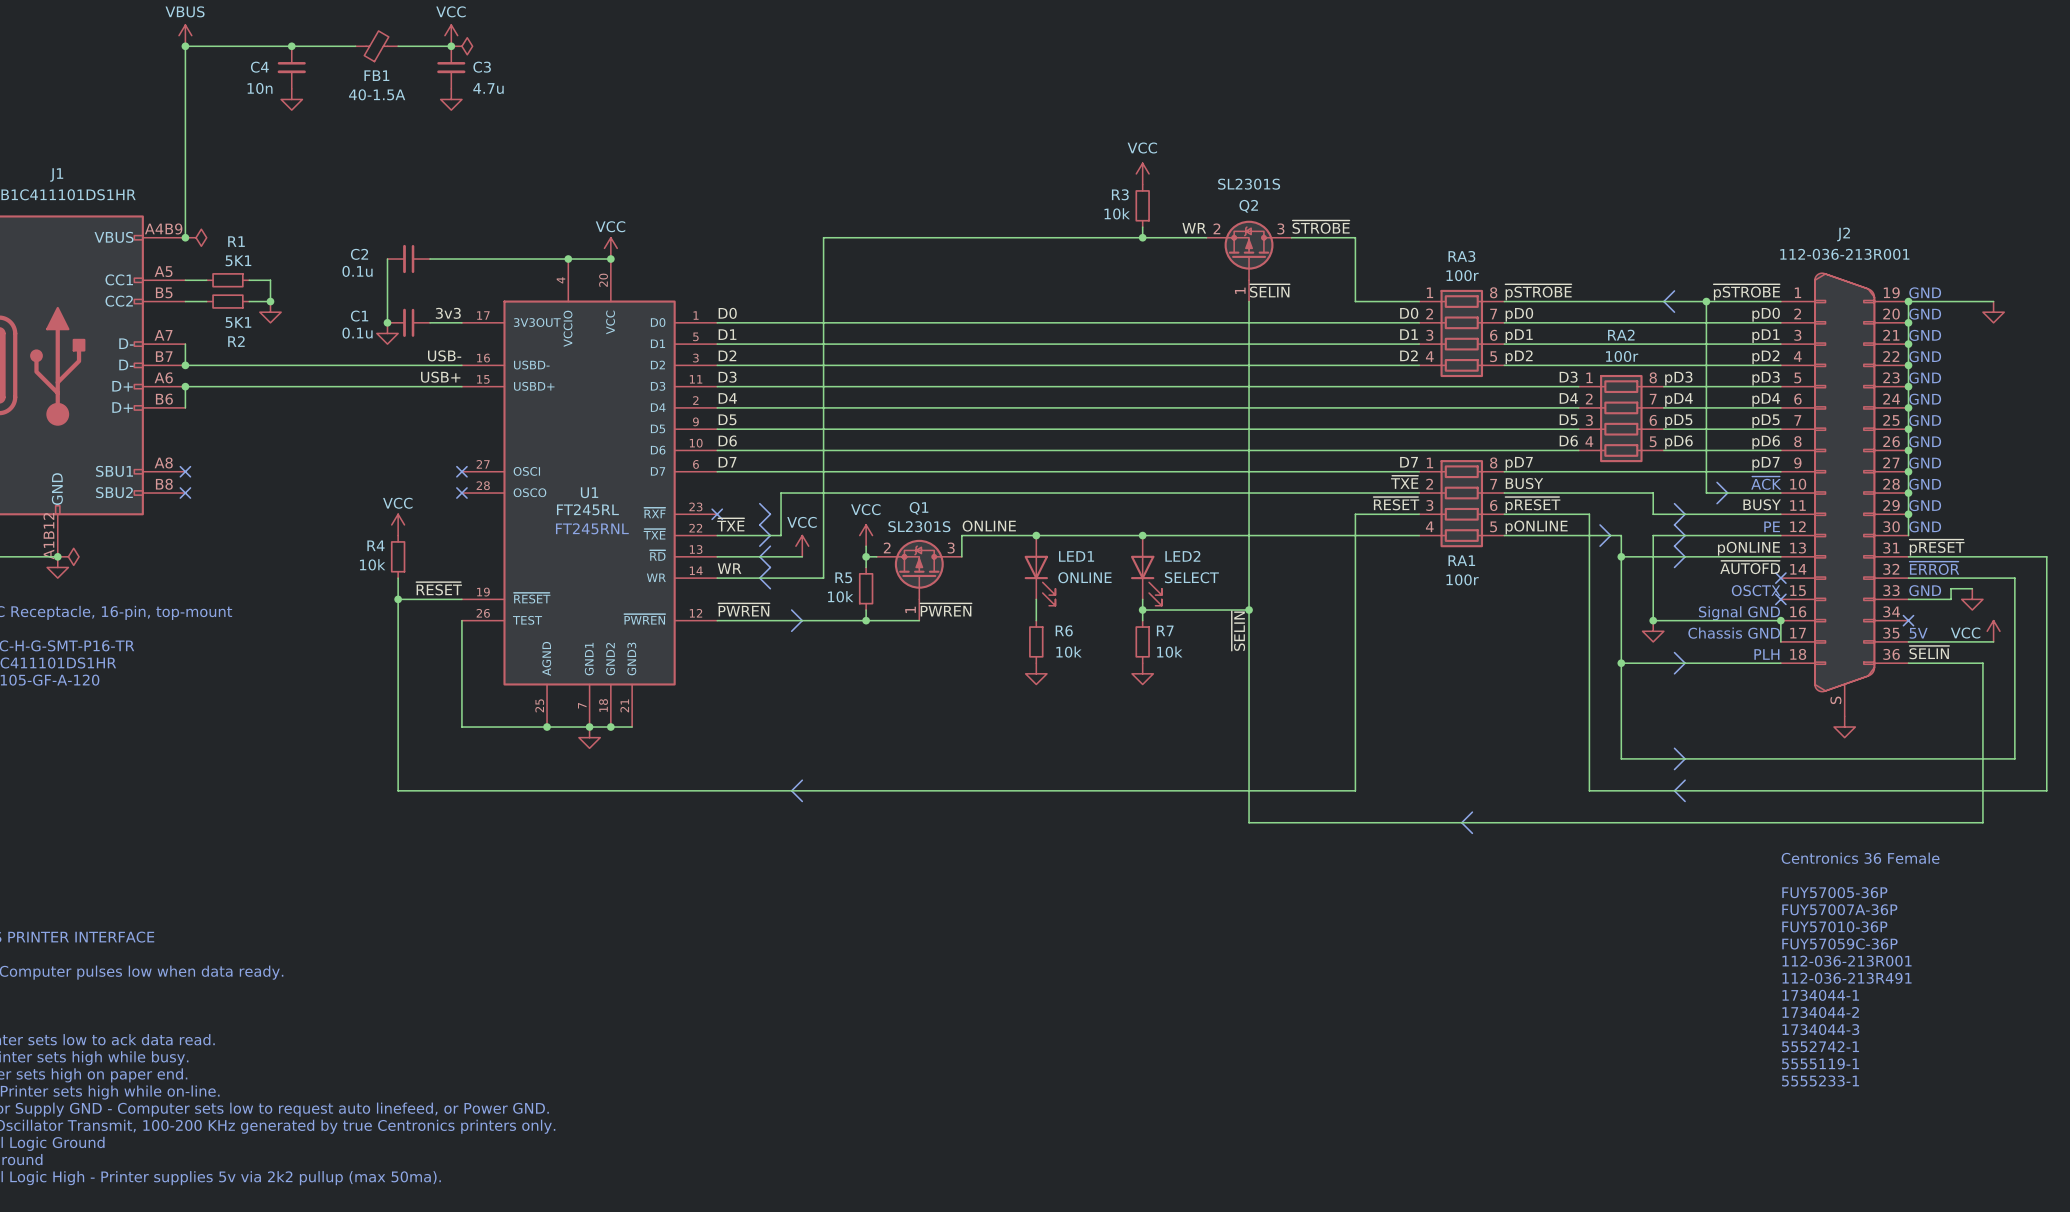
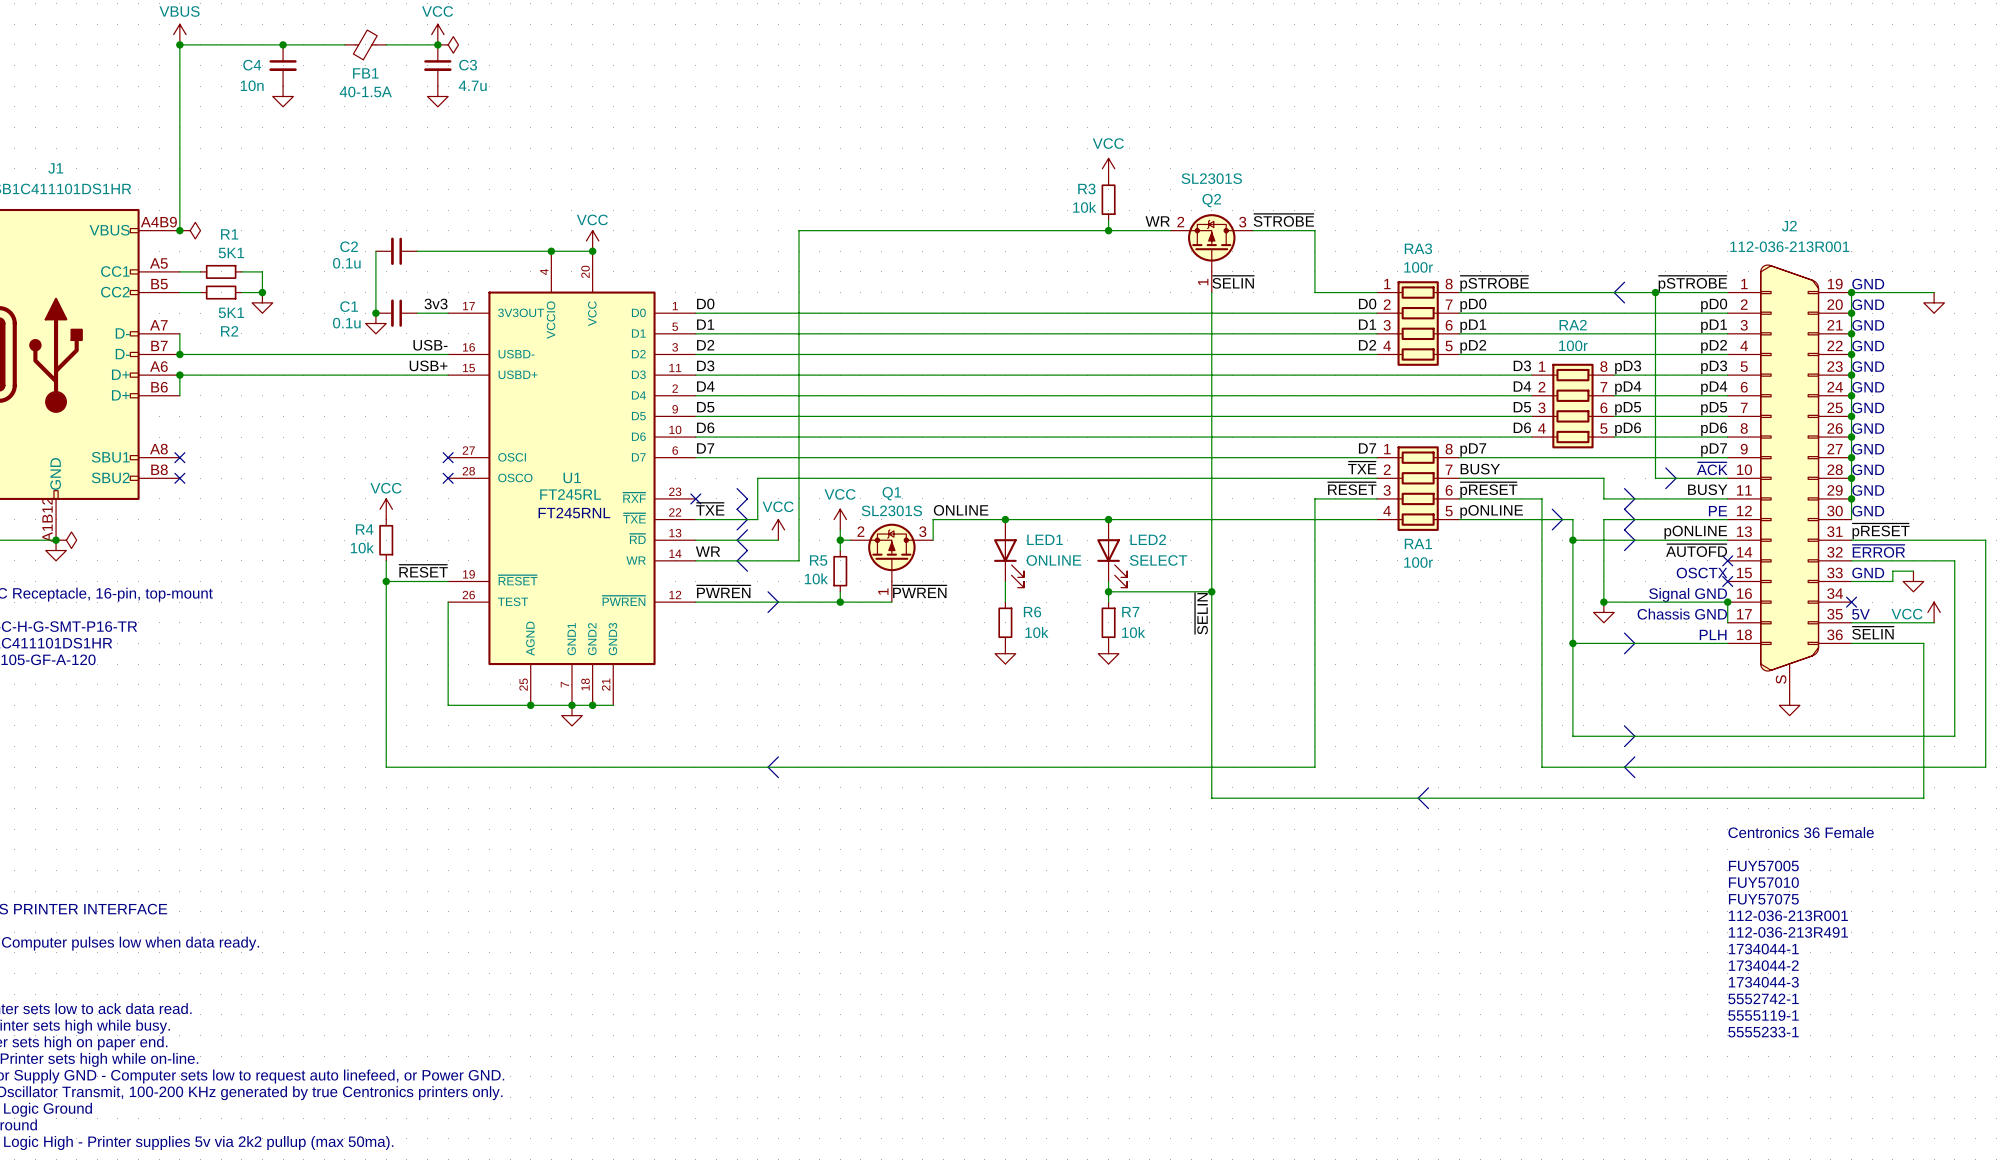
text: FUY57005-36P (1834, 892) -> FUY57005 (1763, 865)
text: FUY57007A-36P (1839, 909) -> FUY57010 (1763, 882)
text: FUY57010-36P (1834, 926) -> FUY57075 (1763, 899)
text: FUY57059C-36P (1839, 944) -> 112-036-213R001 (1788, 915)
text: 112-036-213R001 (1847, 961) -> 112-036-213R491 (1788, 932)
text: 112-036-213R491 (1847, 978) -> 1734044-1 (1763, 949)
text: 1734044-1 (1820, 995) -> 1734044-2 (1763, 965)
text: 1734044-2 (1820, 1012) -> 1734044-3 (1763, 982)
text: 1734044-3 (1820, 1029) -> 5552742-1 (1763, 998)
text: 5552742-1 (1820, 1046) -> 5555119-1 (1763, 1015)
text: 5555119-1 (1820, 1063) -> 5555233-1 (1763, 1032)
text: 5555233-1 (1820, 1081) -> none

